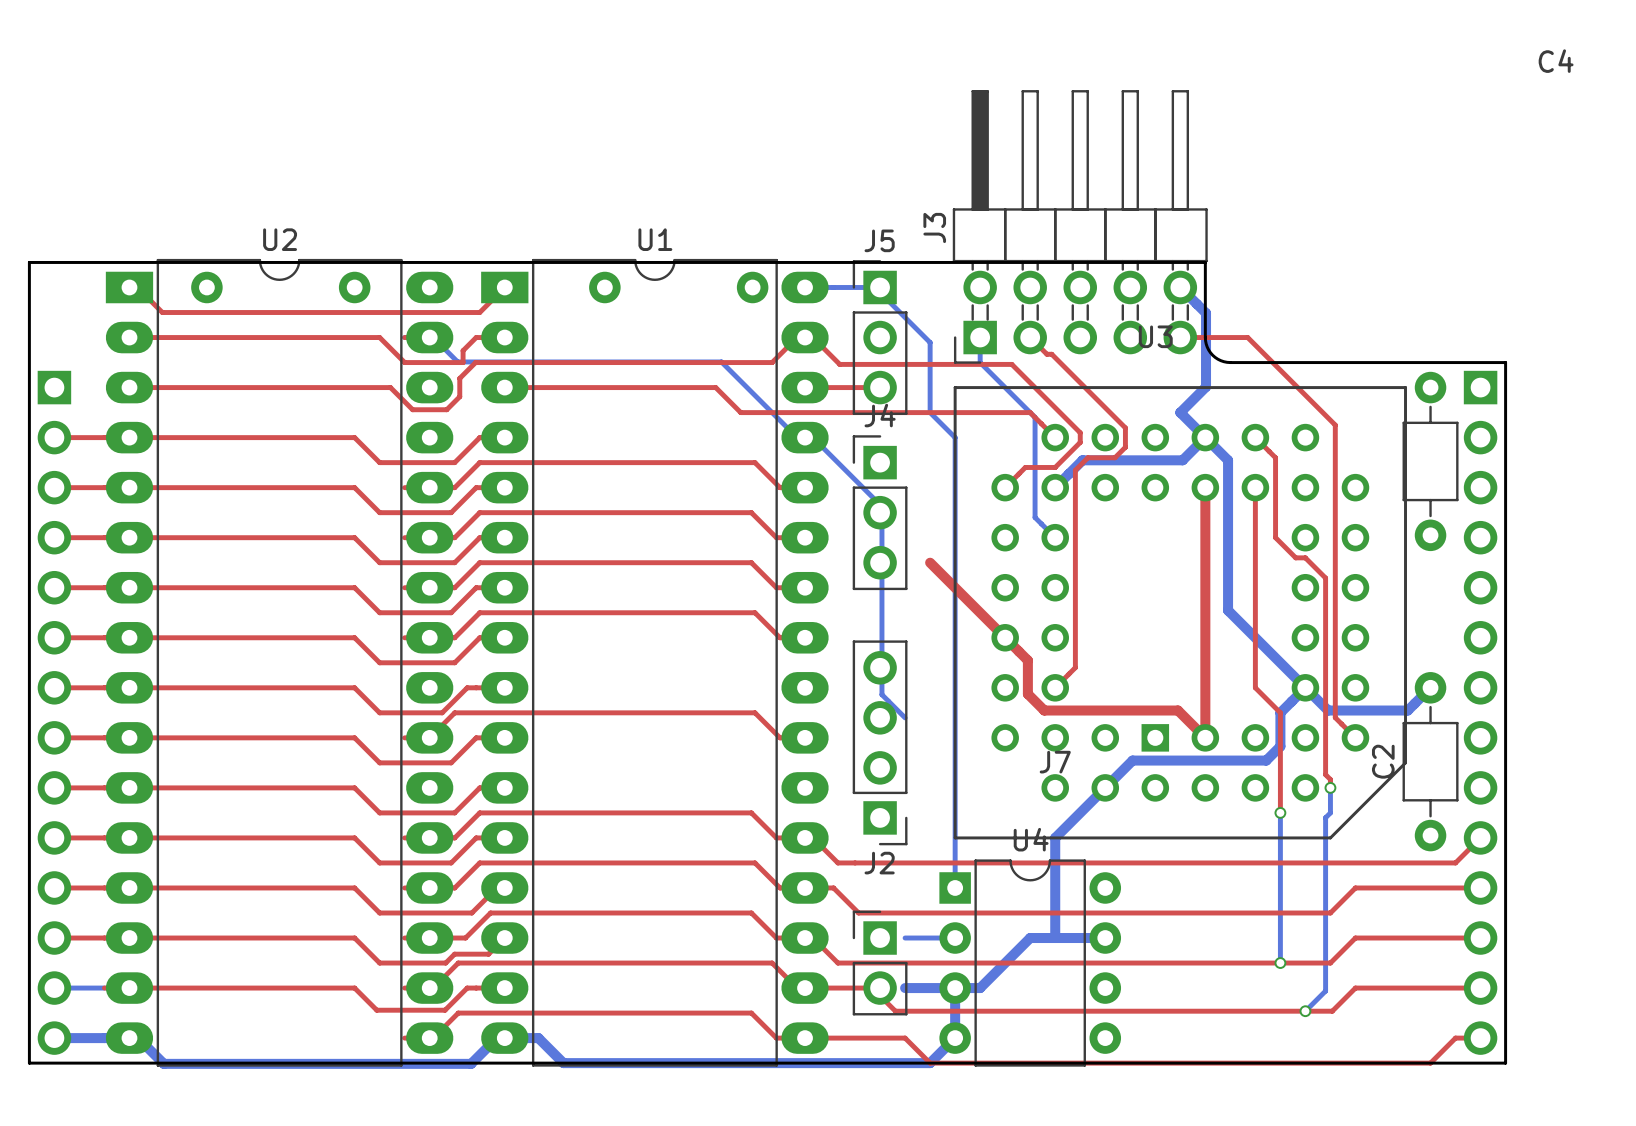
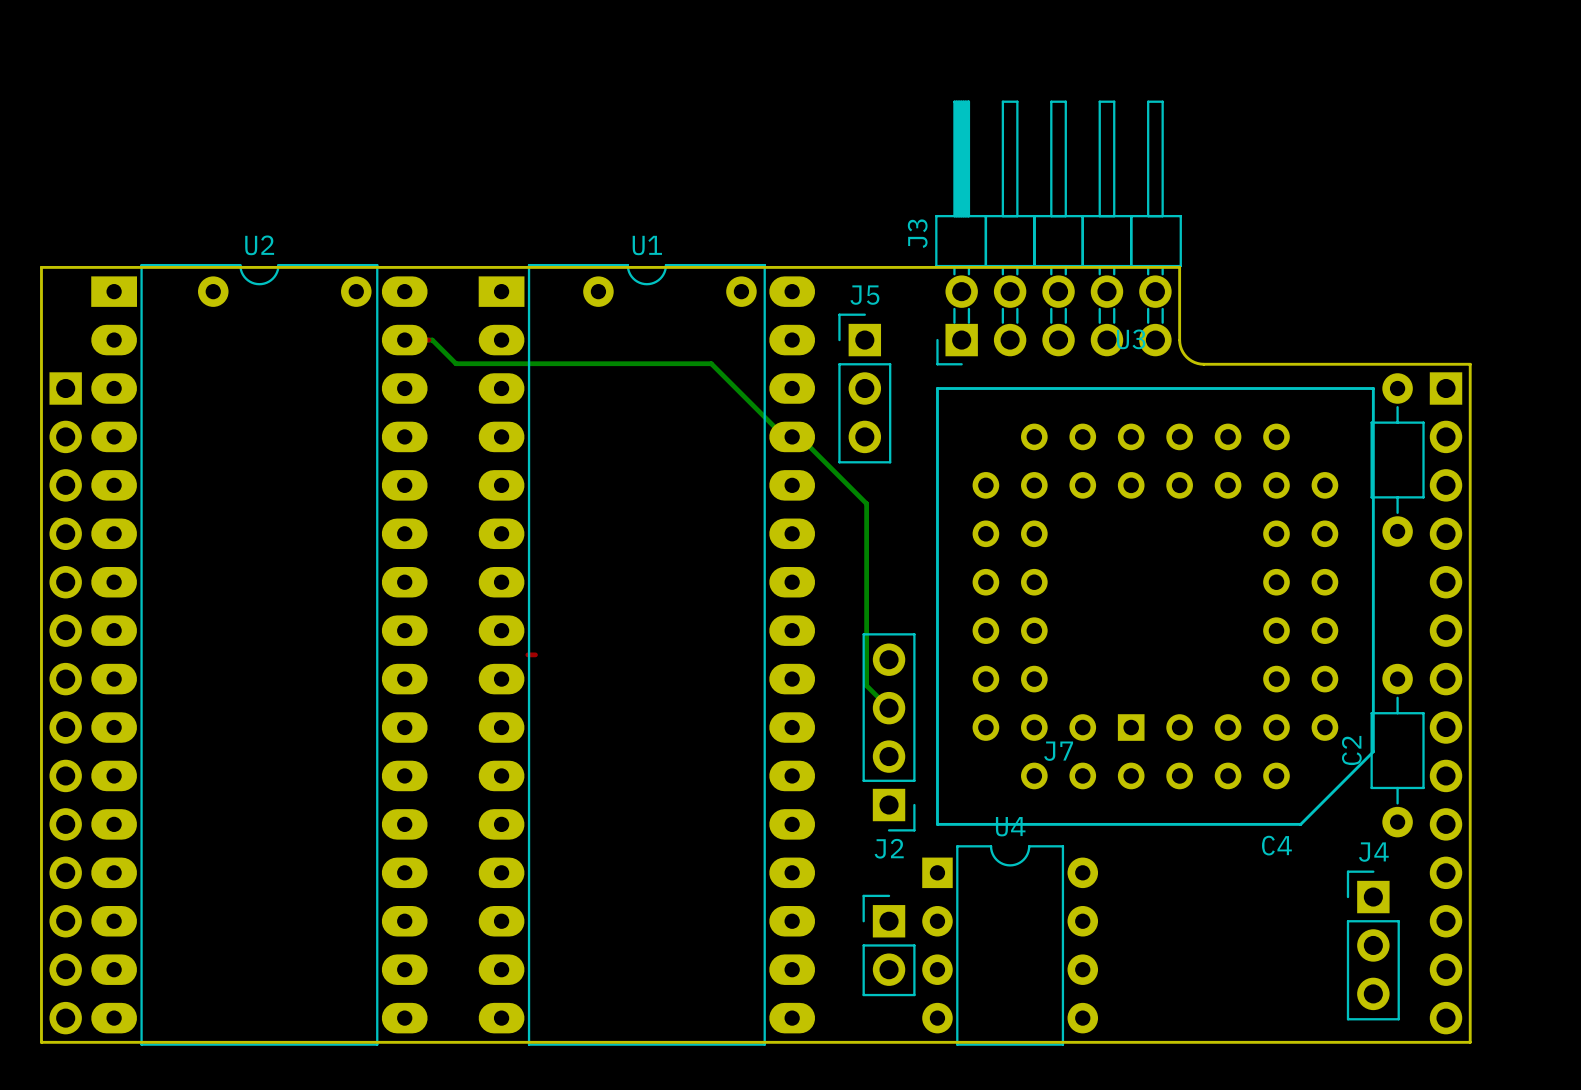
C4 name position: C4 (1556, 61) -> C4 (1276, 845)
top track: (129, 287) (137, 287) (162, 312) (479, 312) (504, 287) -> none
bottom track: (805, 287) (875, 287) (930, 342) (930, 412) (955, 437) (955, 887) -> none
bottom track: (1180, 287) (1206, 313) (1206, 386) (1180, 412) (1228, 460) (1228, 610) (1328, 710) (1407, 710) (1430, 687) -> none
top track: (129, 337) (379, 337) (404, 362) (463, 362) (463, 350) (476, 337) (504, 337) -> none
J5 position: (880, 337) -> (864, 388)
bottom track: (980, 337) (980, 362) (1035, 417) (1035, 517) (1055, 537) -> none
top track: (1030, 337) (1046, 354) (1051, 354) (1125, 427) (1125, 447) (1114, 457) (1087, 457) (1075, 470) (1075, 667) (1055, 687) -> none
top track: (1180, 337) (1247, 337) (1335, 425) (1335, 717) (1355, 737) -> none
top track: (129, 387) (390, 387) (412, 409) (446, 409) (459, 396) (459, 378) (475, 362) (772, 362) (797, 337) (812, 337) (839, 364) (1011, 364) (1080, 432) (1080, 442) (1055, 467) (1025, 467) (1005, 487) -> none
top track: (504, 387) (715, 387) (740, 412) (1030, 412) (1055, 437) -> none
top track: (805, 387) (880, 387) -> none
top track: (54, 437) (354, 437) (379, 462) (454, 462) (479, 437) (504, 437) -> none
bottom track: (1205, 437) (1182, 460) (1082, 460) (1055, 487) -> none
top track: (1255, 437) (1275, 457) (1275, 537) (1295, 557) (1305, 557) (1325, 578) (1325, 774) (1330, 779) (1330, 787) -> none
top track: (54, 487) (354, 487) (379, 512) (451, 512) (476, 487) (504, 487) -> none
top track: (404, 487) (454, 487) (479, 462) (754, 462) (780, 487) (805, 487) -> none
top track: (1205, 487) (1205, 737) (1178, 710) (1044, 710) (1027, 694) (1027, 660) (930, 562) -> none
top track: (1255, 487) (1255, 687) (1280, 712) (1280, 812) -> none
J4 position: (880, 512) -> (1373, 945)
top track: (54, 537) (354, 537) (379, 562) (454, 562) (479, 537) (504, 537) -> none
top track: (404, 537) (454, 537) (479, 512) (751, 512) (776, 537) (805, 537) -> none
top track: (54, 587) (354, 587) (379, 612) (451, 612) (476, 587) (504, 587) -> none
top track: (404, 587) (454, 587) (479, 562) (751, 562) (776, 587) (805, 587) -> none
top track: (54, 637) (354, 637) (379, 662) (454, 662) (479, 637) (504, 637) -> none
top track: (404, 637) (454, 637) (479, 612) (754, 612) (780, 637) (805, 637) -> none
U2 position: (279, 662) -> (259, 654)
top track: none -> (527, 654) (535, 654)
top track: (54, 687) (354, 687) (379, 712) (442, 712) (467, 687) (504, 687) -> none
bottom track: (1305, 687) (1280, 712) (1280, 746) (1266, 760) (1132, 760) (1055, 837) (1055, 938) -> none
top track: (54, 737) (354, 737) (379, 762) (451, 762) (476, 737) (504, 737) -> none
top track: (404, 737) (429, 737) (454, 712) (754, 712) (780, 737) (805, 737) -> none
J2 position: (880, 742) -> (889, 732)
top track: (54, 787) (354, 787) (379, 812) (454, 812) (479, 787) (504, 787) -> none
bottom track: (1330, 787) (1330, 812) (1325, 817) (1325, 991) (1305, 1011) -> none
via: (1330, 787) -> none
bottom track: (1280, 812) (1280, 963) -> none
via: (1280, 812) -> none
top track: (54, 837) (354, 837) (379, 862) (451, 862) (476, 837) (504, 837) -> none
top track: (404, 837) (454, 837) (479, 812) (751, 812) (776, 837) (812, 837) (837, 862) (1455, 862) (1480, 837) -> none
top track: (54, 887) (354, 887) (379, 912) (471, 912) (496, 887) (504, 887) -> none
top track: (404, 887) (454, 887) (479, 862) (754, 862) (780, 887) (833, 887) (858, 912) (1330, 912) (1355, 887) (1480, 887) -> none
top track: (54, 938) (354, 938) (379, 963) (445, 963) (454, 954) (488, 954) (504, 938) -> none
top track: (404, 938) (465, 938) (490, 912) (751, 912) (776, 938) (812, 938) (837, 963) (1330, 963) (1355, 938) (1480, 938) -> none
bottom track: (905, 938) (955, 938) -> none
bottom track: (1105, 938) (1030, 938) (980, 988) (905, 988) -> none
J7 position: (880, 963) -> (889, 945)
via: (1280, 963) -> none
bottom track: (54, 988) (104, 988) -> none
top track: (104, 988) (354, 988) (376, 1010) (445, 1010) (467, 988) (504, 988) -> none
top track: (404, 988) (433, 988) (458, 963) (772, 963) (797, 988) (872, 988) (895, 1011) (1332, 1011) (1355, 988) (1480, 988) -> none
bottom track: (955, 988) (955, 1038) (930, 1063) (563, 1063) (538, 1038) (496, 1038) (471, 1063) (163, 1063) (138, 1038) (54, 1038) -> none
via: (1305, 1011) -> none
top track: (404, 1038) (433, 1038) (458, 1013) (751, 1013) (776, 1038) (905, 1038) (930, 1063) (1430, 1063) (1455, 1038) (1480, 1038) -> none

